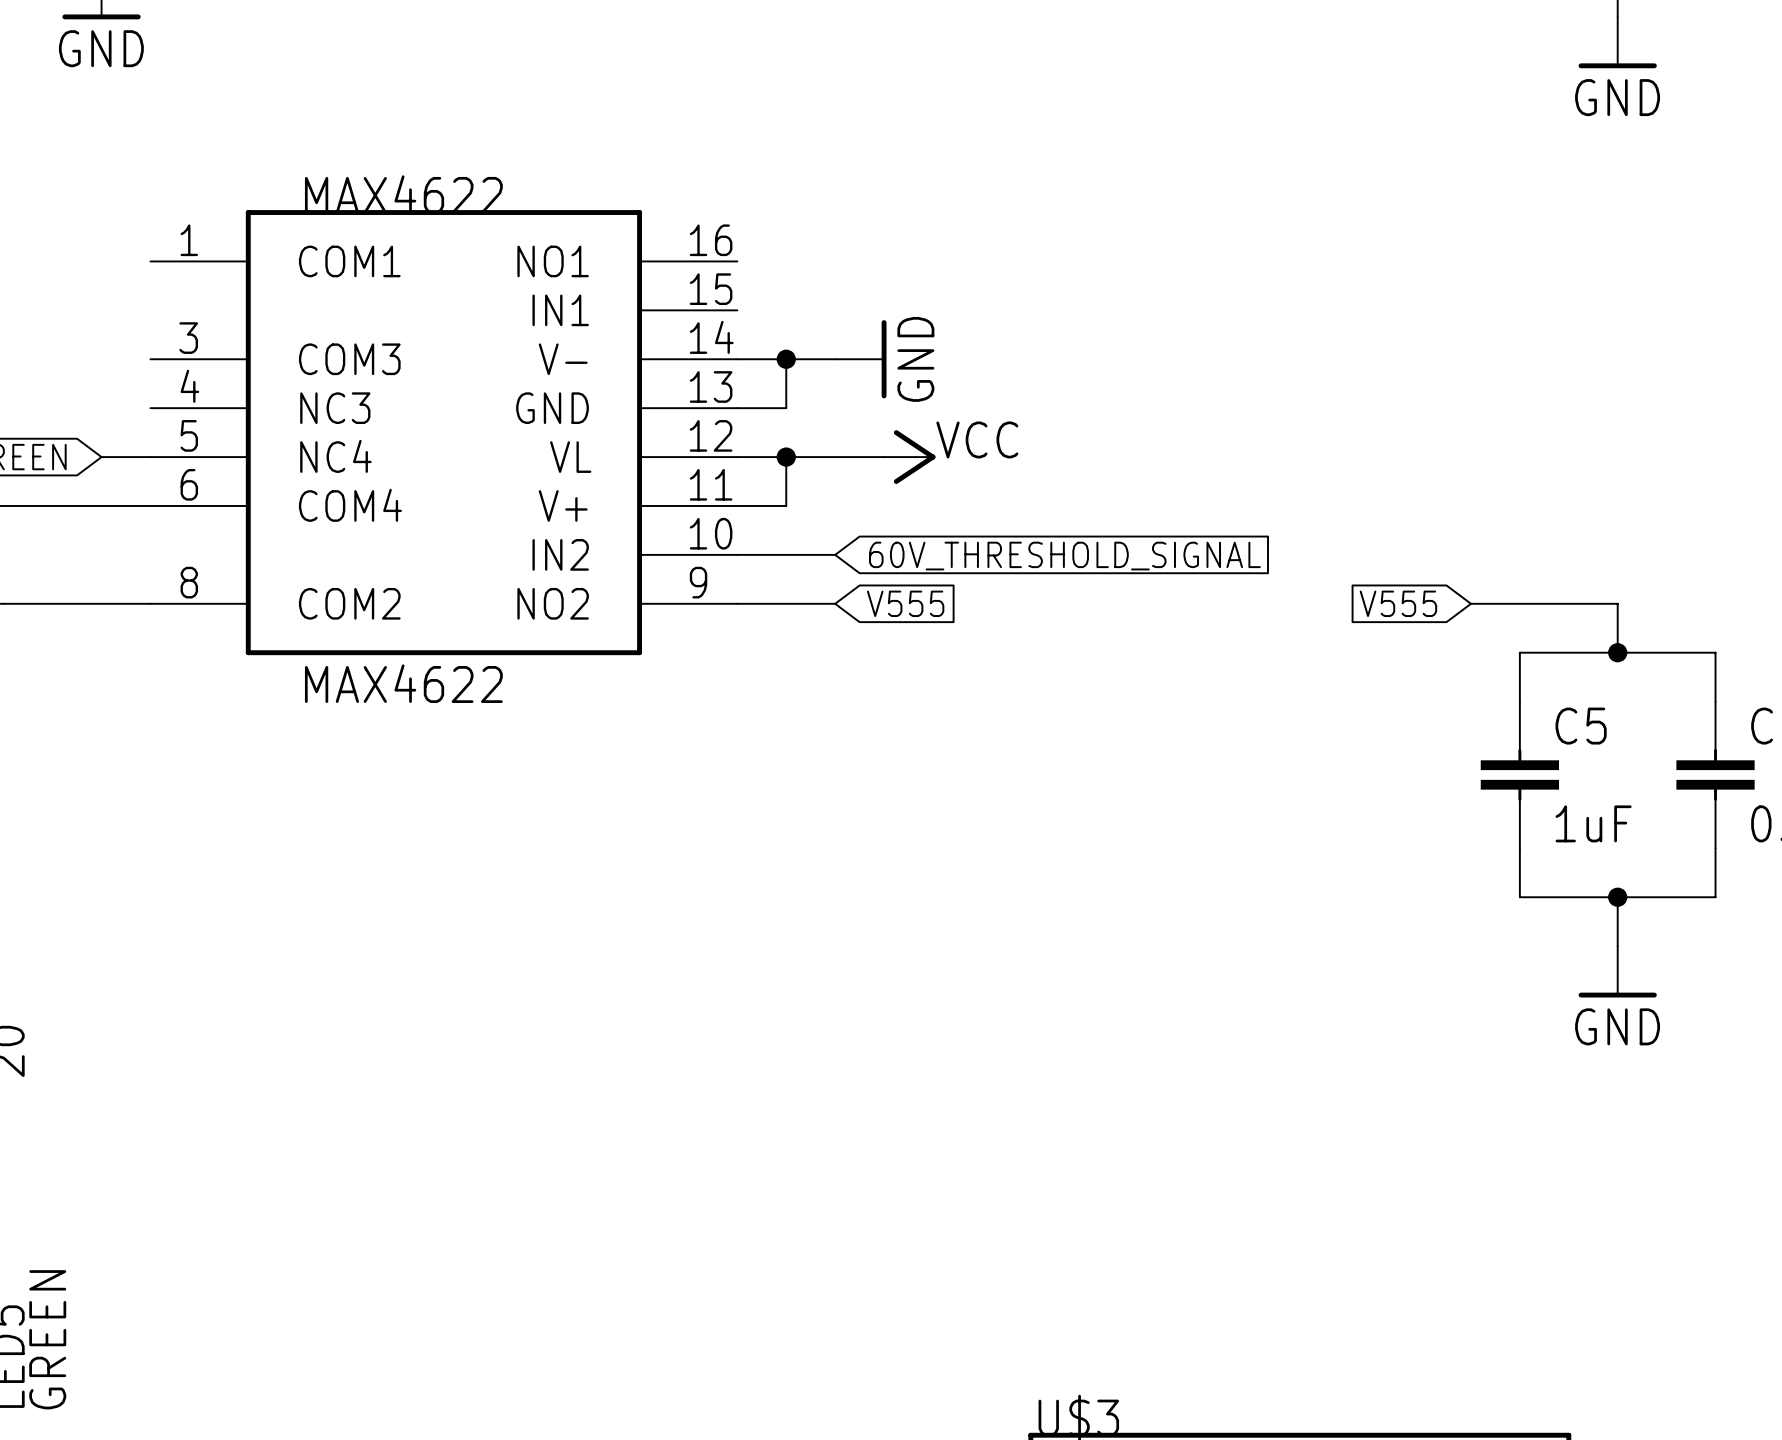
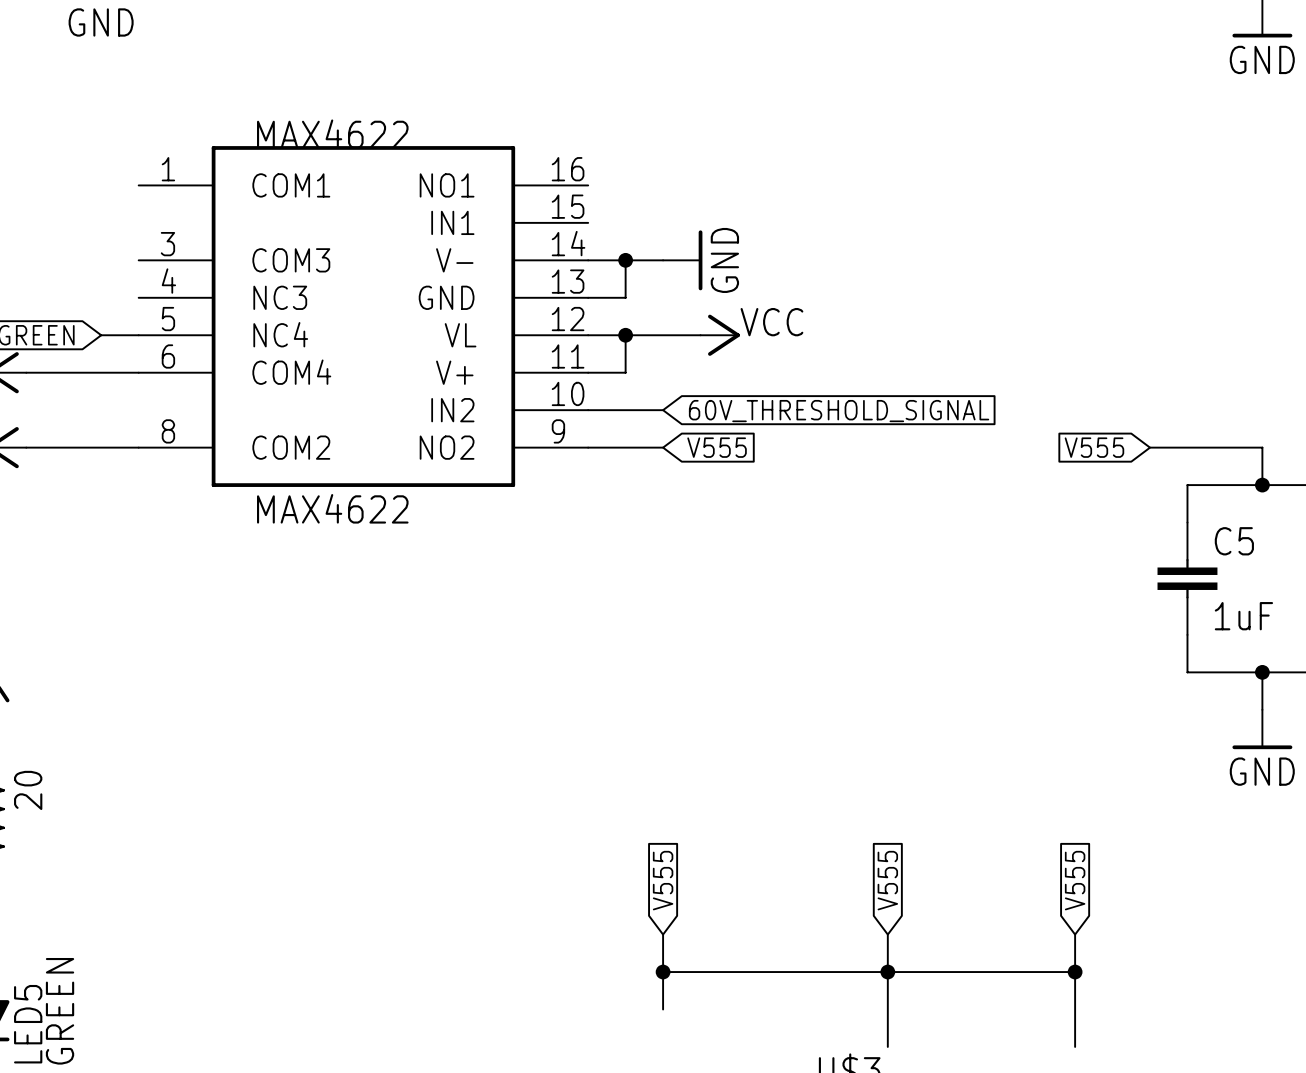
global label: none -> V555 (663, 880)
global label: none -> V555 (887, 880)
global label: none -> V555 (1075, 880)
wire: none -> (663, 934) (663, 1009)
wire: none -> (887, 934) (887, 1046)
wire: none -> (1075, 934) (1075, 1046)
wire: none -> (663, 972) (1075, 972)
junction: none -> (663, 972)
junction: none -> (887, 972)
junction: none -> (1075, 972)

